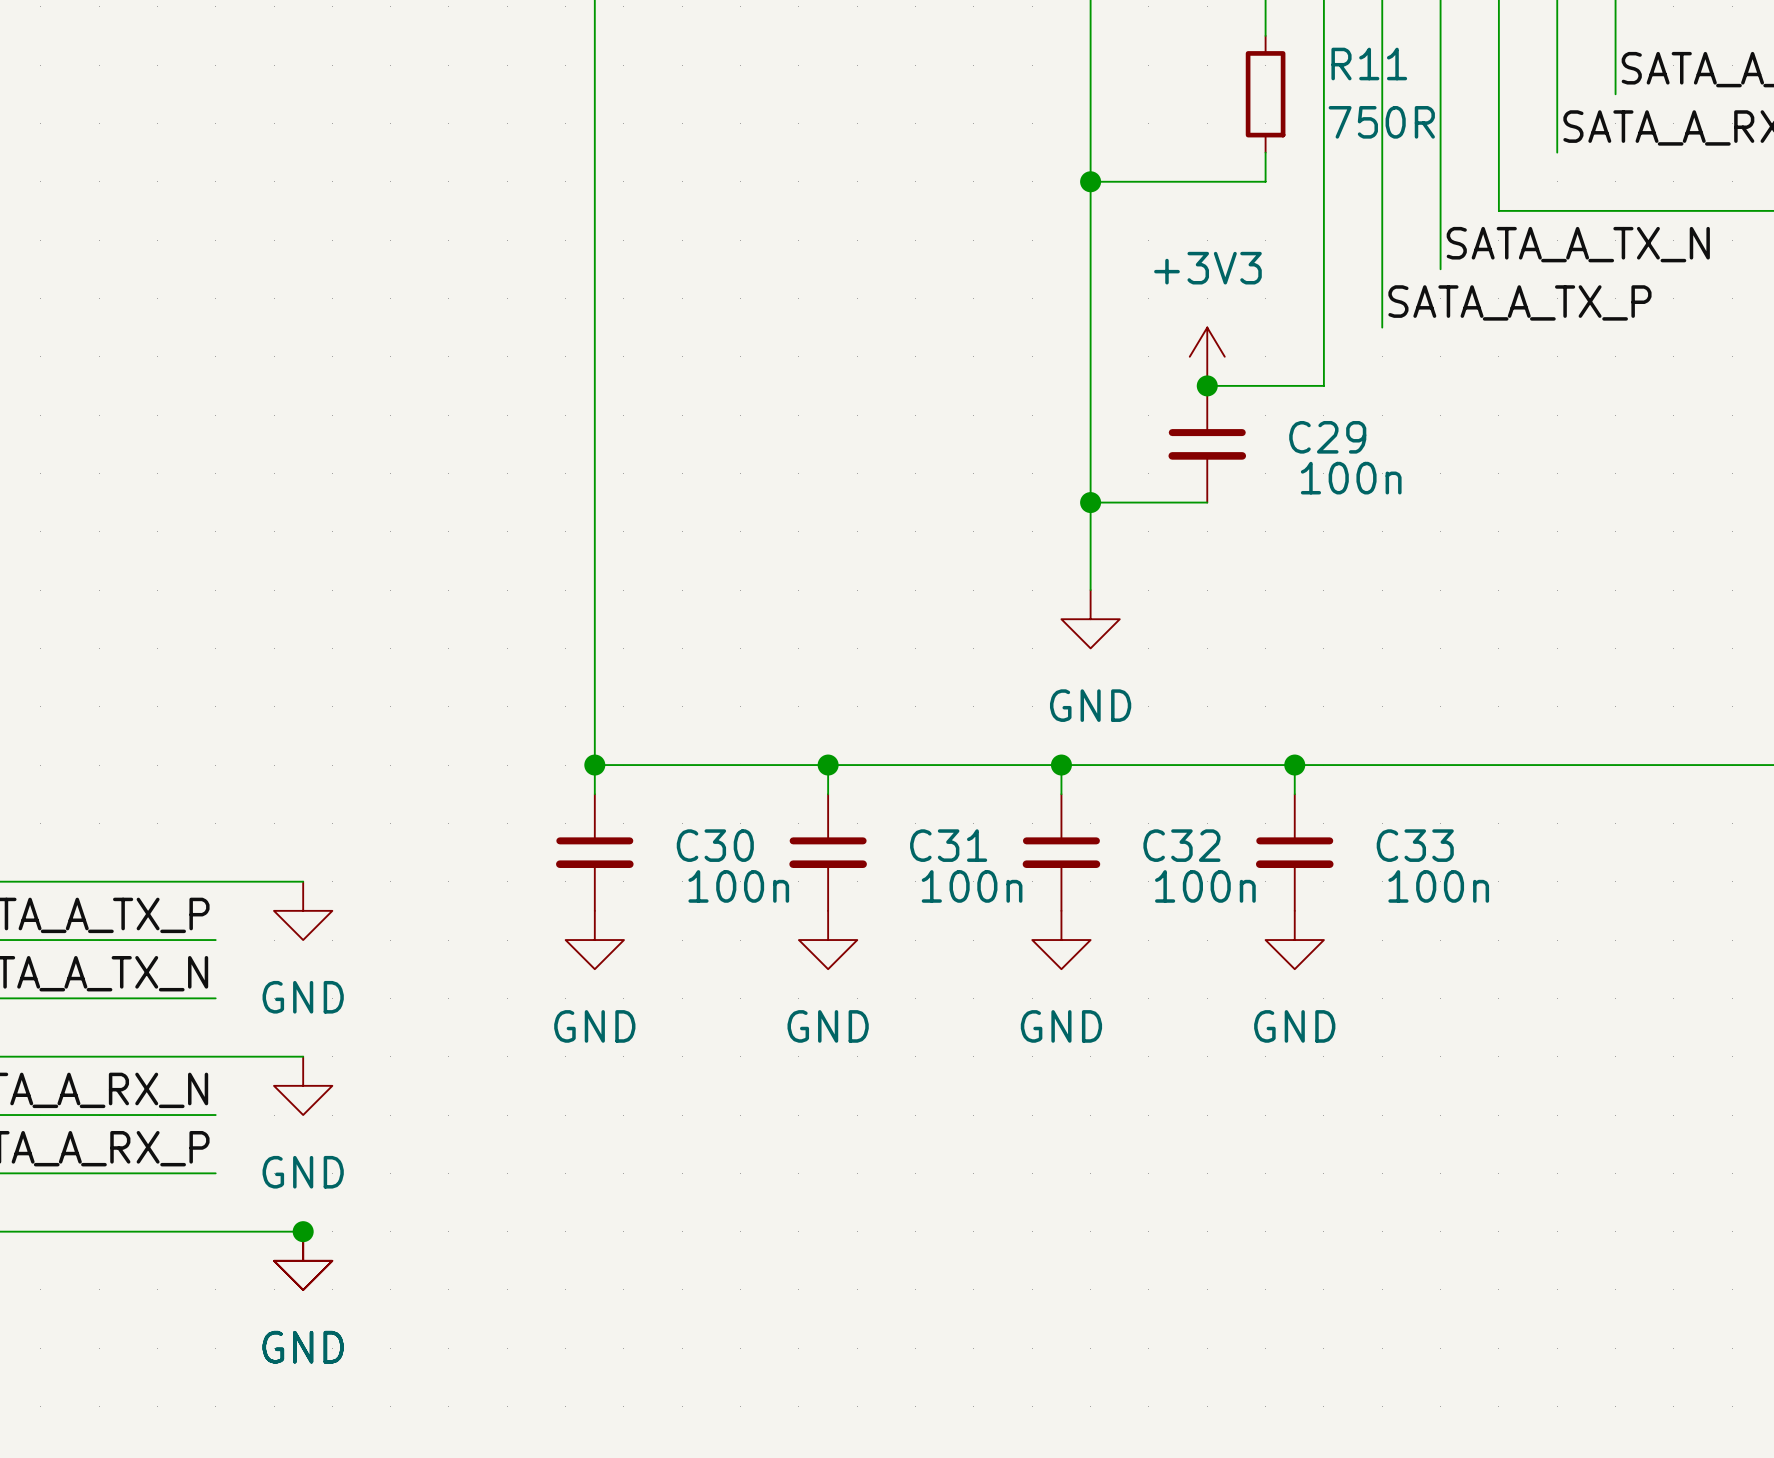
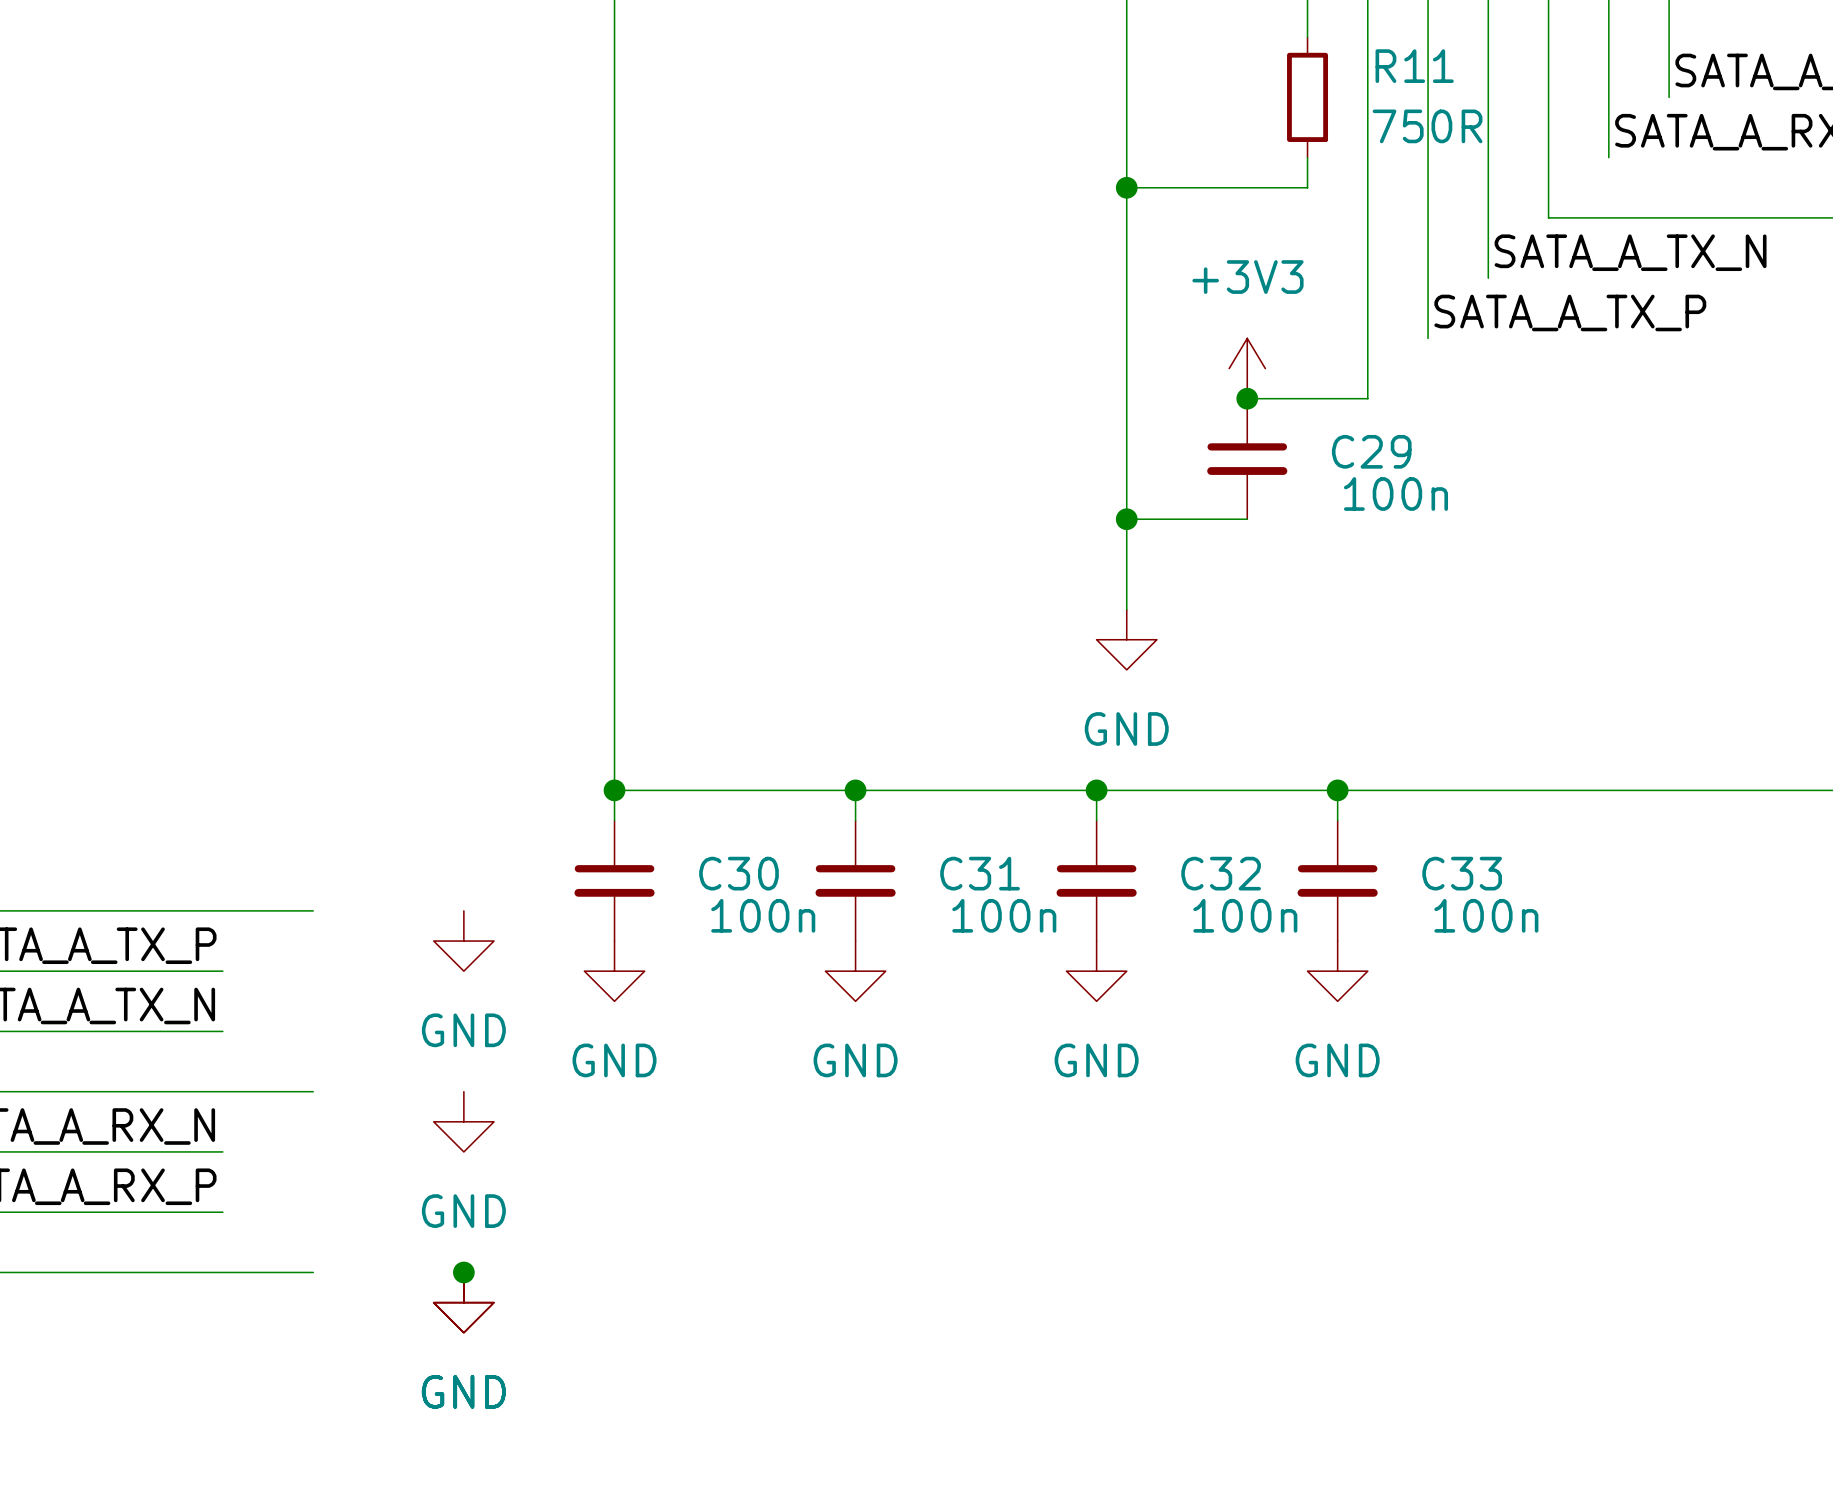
power symbol: GND (303, 910) -> none
power symbol: none -> GND (463, 941)
power symbol: GND (303, 1085) -> none
power symbol: none -> GND (463, 1121)
junction: (303, 1231) -> none
junction: none -> (463, 1272)
power symbol: GND (303, 1260) -> none
power symbol: none -> GND (463, 1302)

